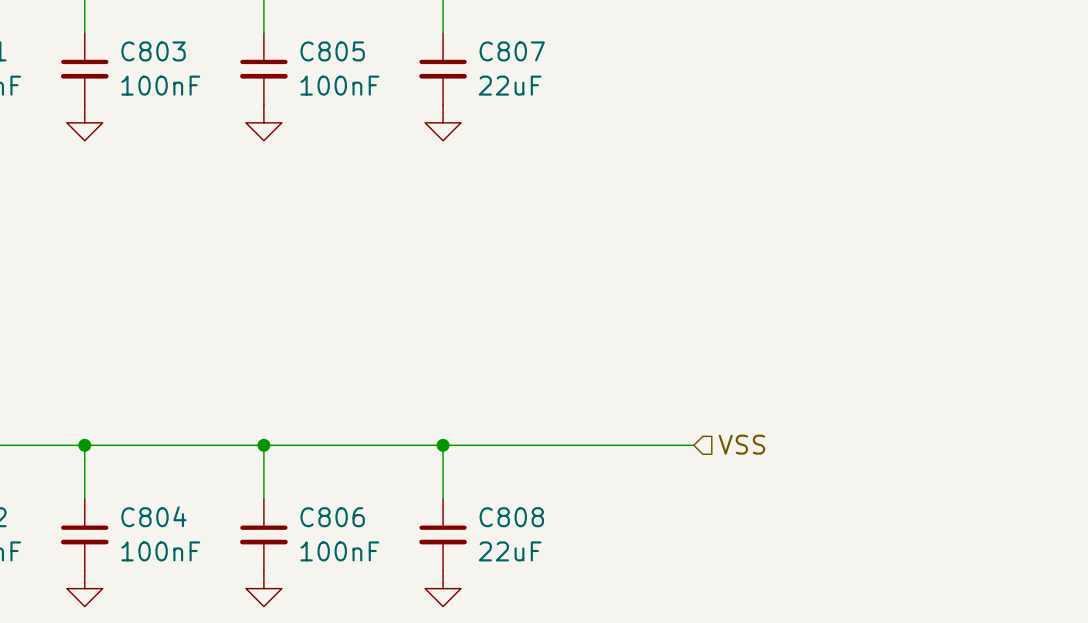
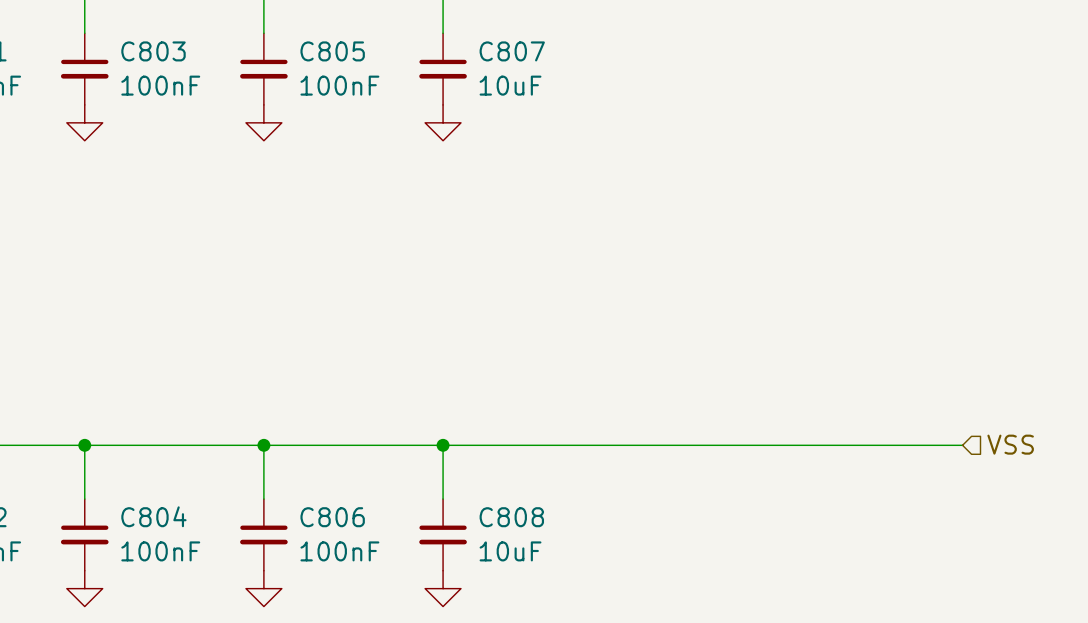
C807 value: 22uF (510, 85) -> 10uF (510, 85)
hierarchical label position: VSS (741, 444) -> VSS (1010, 444)
wire: none -> (693, 445) (962, 445)
C808 value: 22uF (510, 551) -> 10uF (510, 551)

